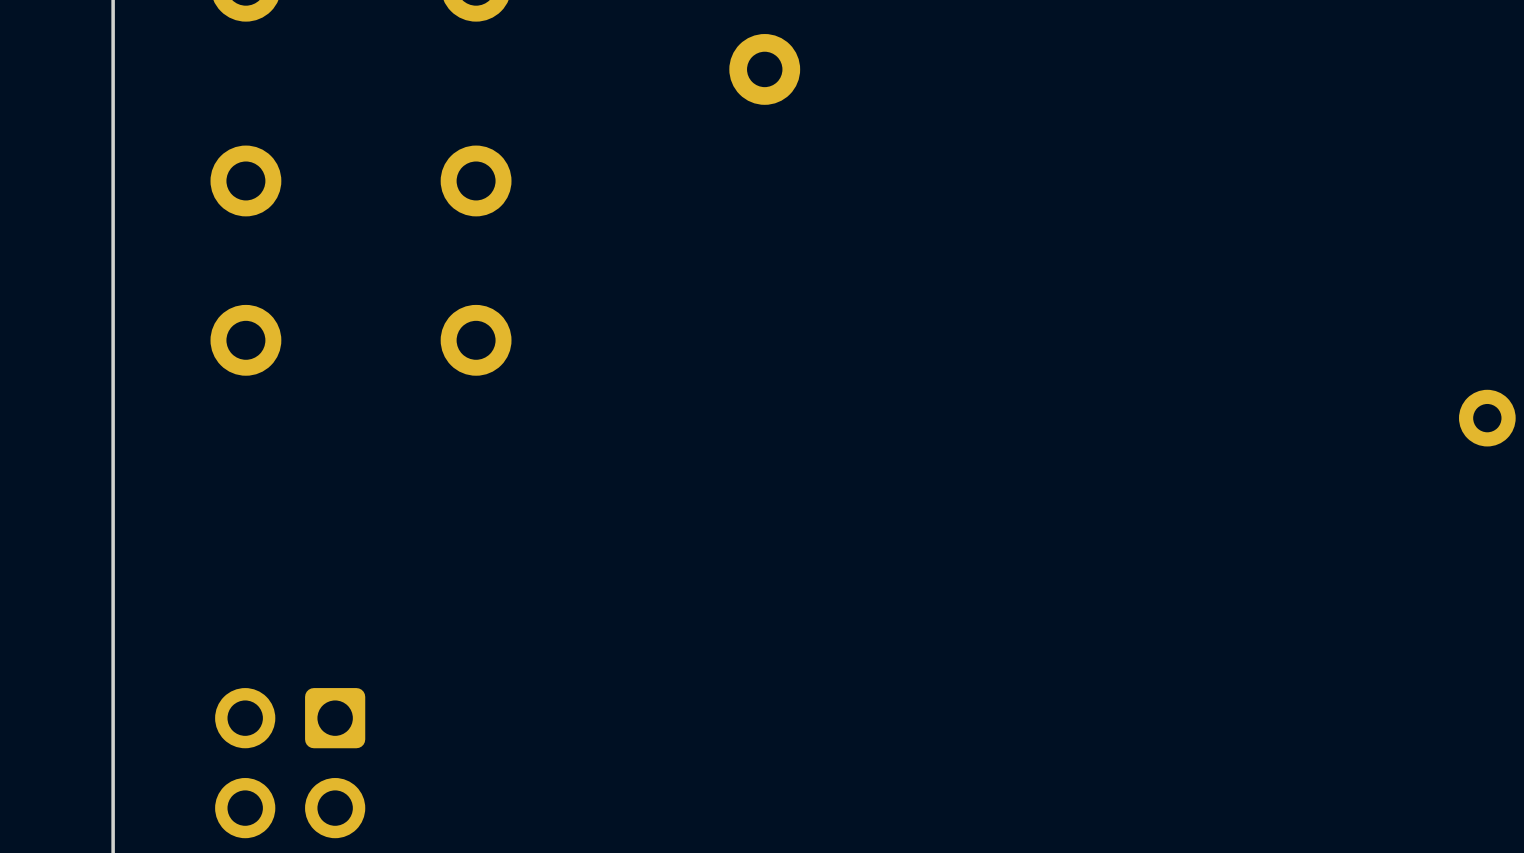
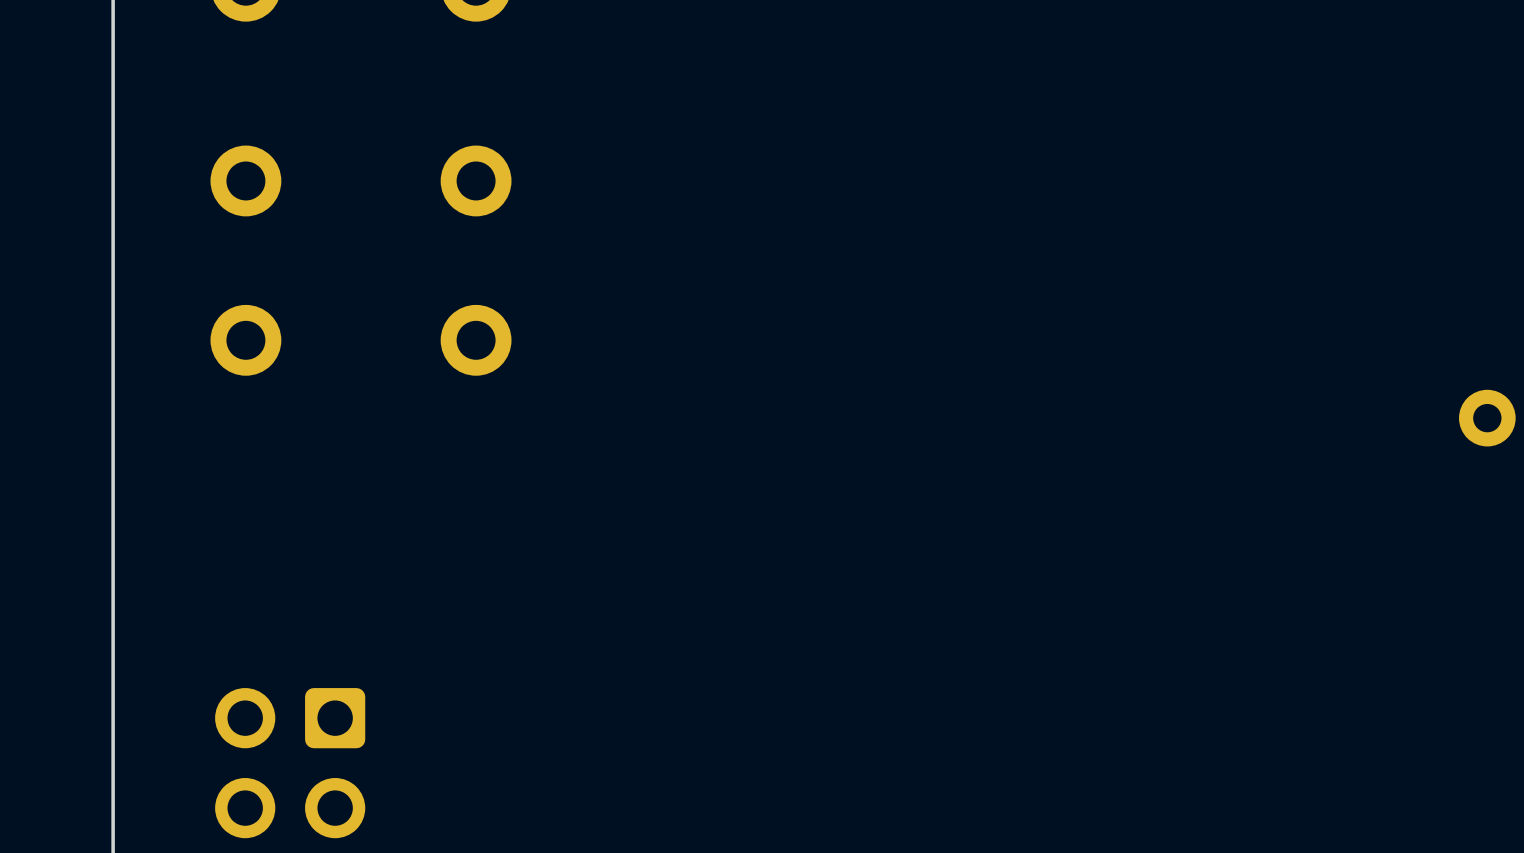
part: (764, 69) -> none

